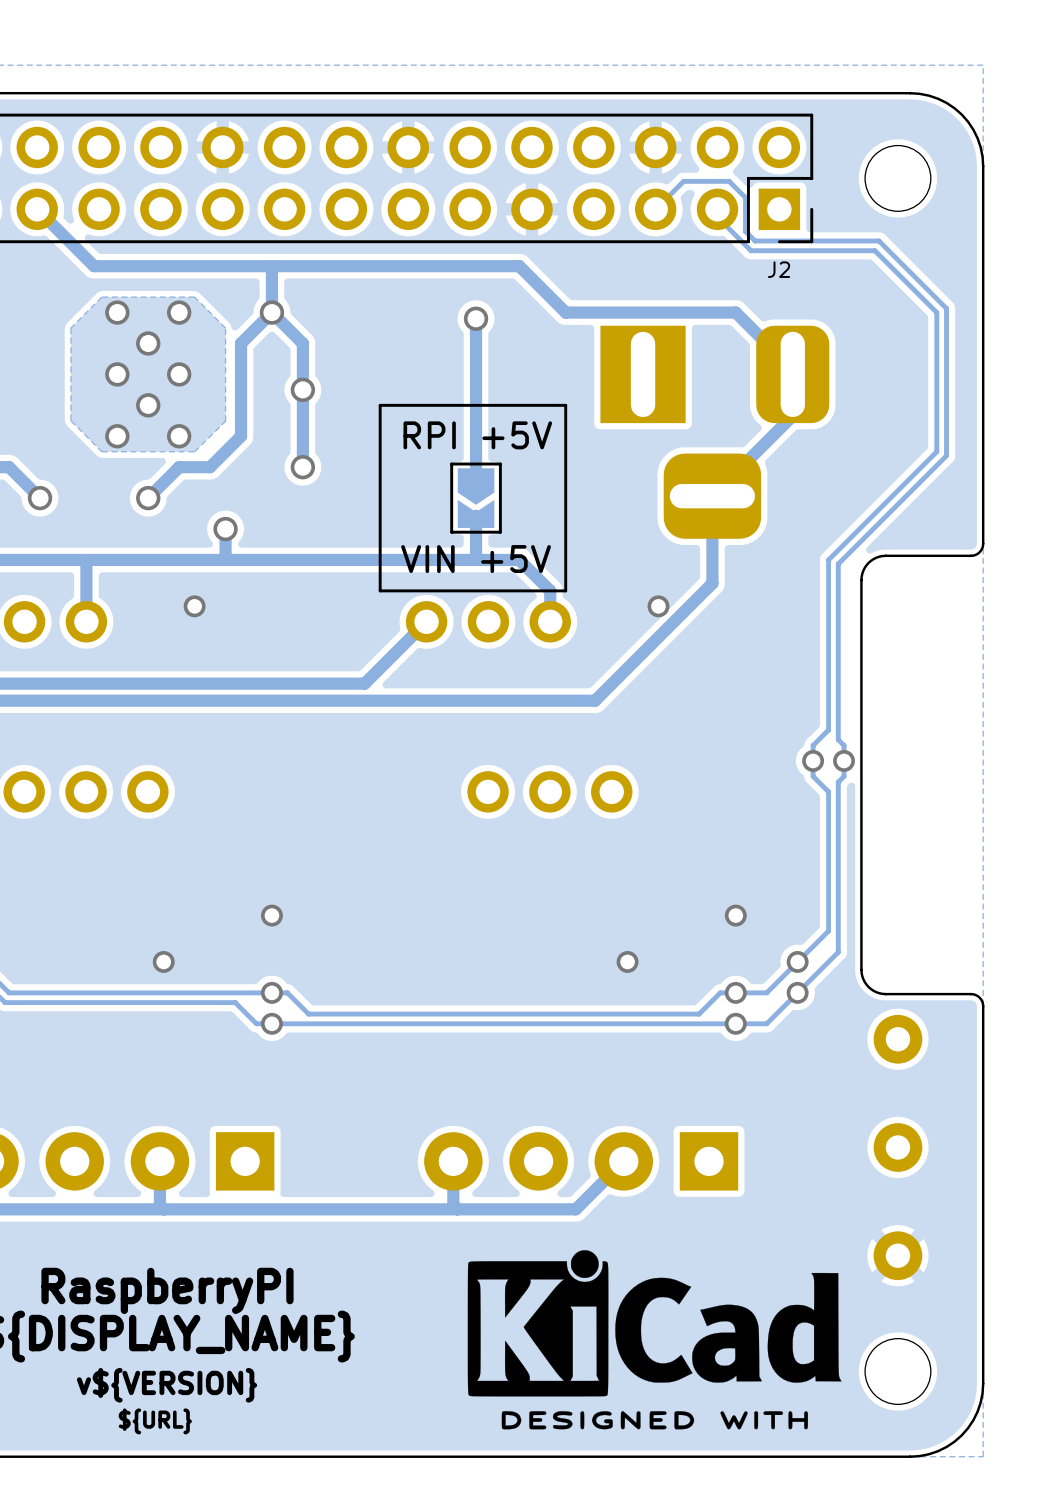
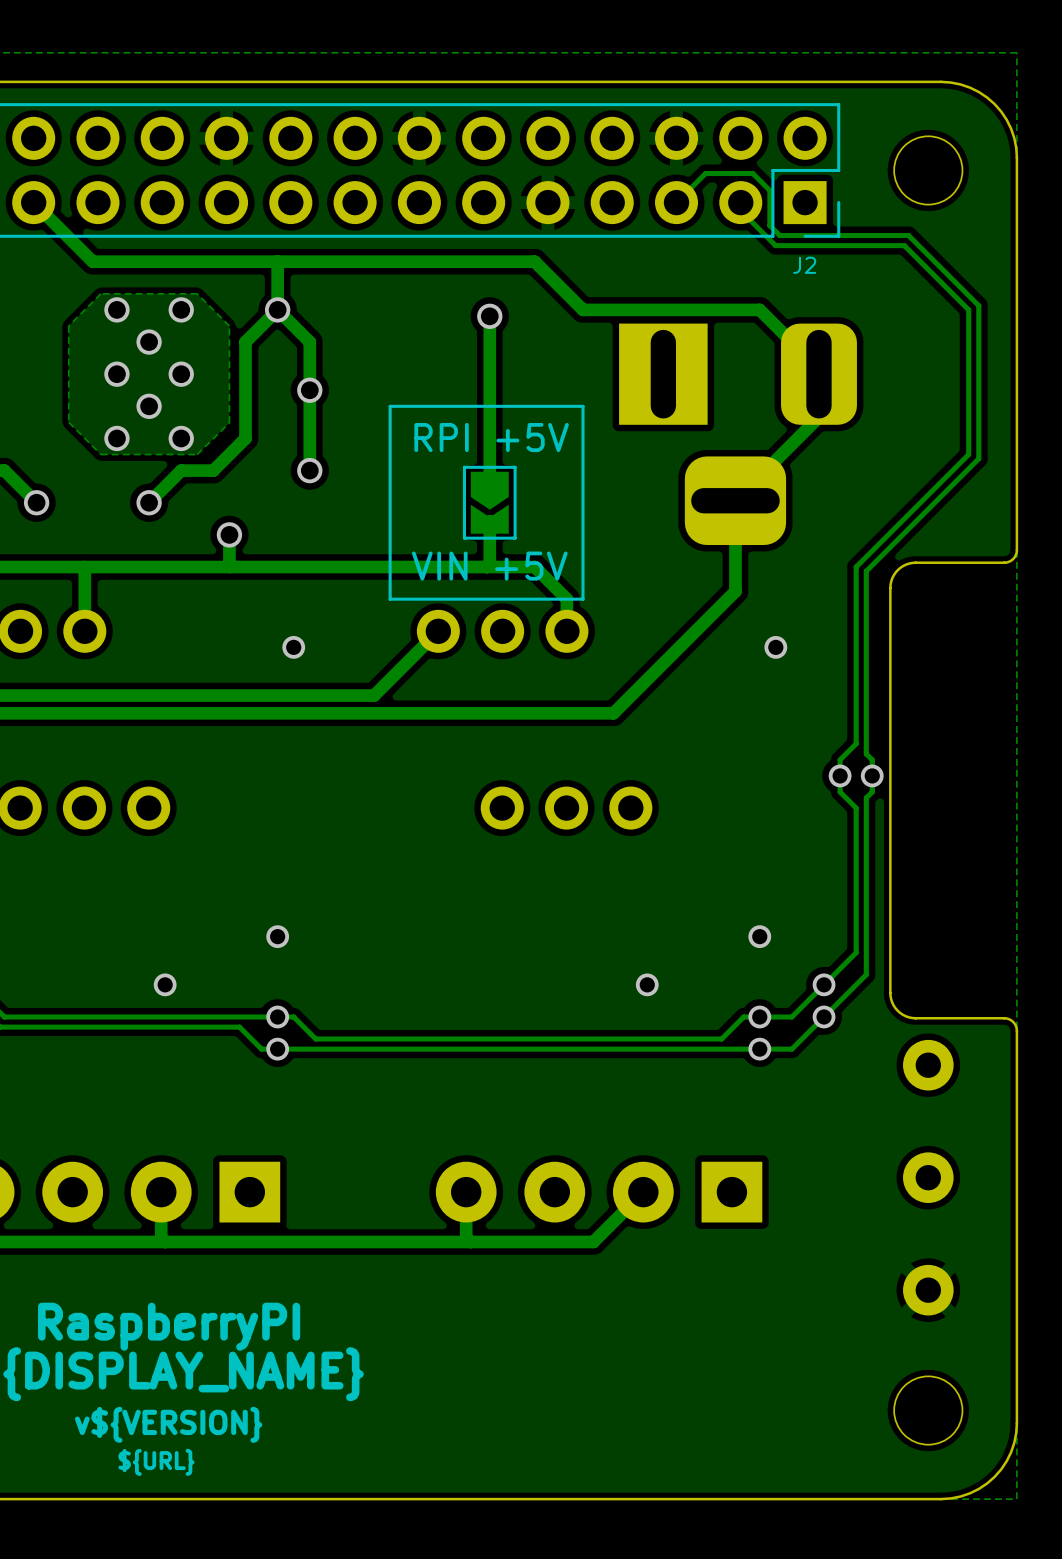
via position: (194, 606) -> (293, 647)
via position: (658, 606) -> (775, 647)
drawing: [467, 1250, 842, 1430] -> none

